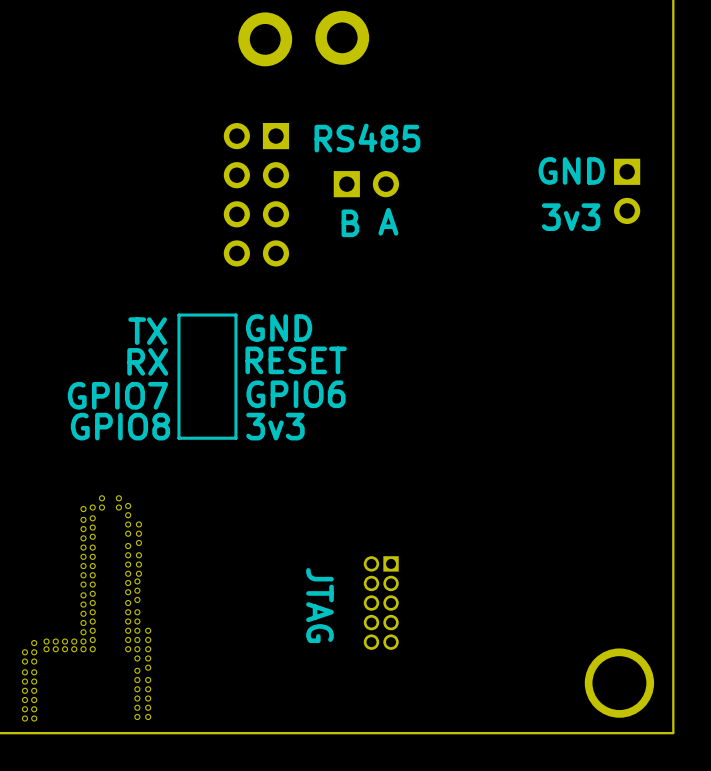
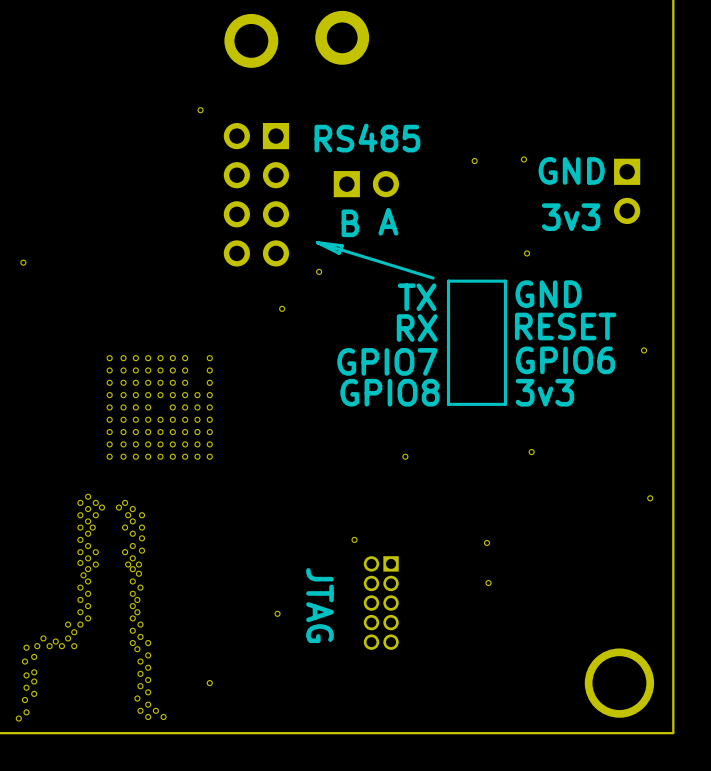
part footprint: [238, 12, 293, 67] -> [224, 13, 279, 68]
part: none -> (200, 110)
part: none -> (523, 159)
part: none -> (474, 161)
line: none -> (317, 242) (339, 253) (342, 245) (317, 242)
line: none -> (317, 242) (433, 278)
part: none -> (527, 253)
part: none -> (23, 262)
part: none -> (319, 271)
part: none -> (282, 308)
line: (235, 315) (235, 438) (178, 438) (178, 315) (235, 315) -> (505, 281) (505, 404) (448, 404) (448, 281) (505, 281)
text position: GND (279, 328) -> GND (548, 294)
text position: TX (147, 331) -> TX (417, 297)
part: none -> (644, 350)
part: none -> (109, 358)
part: none -> (123, 358)
part: none -> (135, 358)
part: none -> (148, 358)
part: none -> (160, 358)
part: none -> (172, 358)
part: none -> (185, 358)
part: none -> (209, 358)
text position: RESET (296, 360) -> RESET (565, 326)
text position: RX (147, 361) -> RX (417, 328)
part: none -> (109, 370)
part: none -> (123, 370)
part: none -> (135, 370)
part: none -> (148, 370)
part: none -> (160, 370)
part: none -> (172, 370)
part: none -> (185, 370)
part: none -> (209, 370)
part: none -> (109, 382)
part: none -> (123, 382)
part: none -> (135, 382)
part: none -> (148, 382)
part: none -> (160, 382)
part: none -> (172, 382)
part: none -> (185, 382)
part: none -> (209, 382)
text position: GPIO6 (296, 394) -> GPIO6 (565, 360)
part: none -> (109, 395)
text position: GPIO7 (117, 395) -> GPIO7 (387, 361)
part: none -> (123, 395)
part: none -> (135, 395)
part: none -> (148, 395)
part: none -> (160, 395)
part: none -> (172, 395)
part: none -> (185, 395)
part: none -> (197, 395)
part: none -> (209, 395)
part: none -> (109, 407)
part: none -> (123, 407)
part: none -> (135, 407)
part: none -> (148, 407)
part: none -> (172, 407)
part: none -> (185, 407)
part: none -> (197, 407)
part: none -> (209, 407)
part: none -> (109, 419)
part: none -> (123, 419)
part: none -> (135, 419)
part: none -> (148, 419)
part: none -> (160, 419)
part: none -> (172, 419)
part: none -> (185, 419)
part: none -> (197, 419)
part: none -> (209, 419)
text position: GPIO8 (120, 426) -> GPIO8 (389, 392)
text position: 3v3 (275, 426) -> 3v3 (544, 392)
part: none -> (109, 432)
part: none -> (123, 432)
part: none -> (135, 432)
part: none -> (148, 432)
part: none -> (160, 432)
part: none -> (172, 432)
part: none -> (185, 432)
part: none -> (197, 432)
part: none -> (209, 432)
part: none -> (109, 444)
part: none -> (123, 444)
part: none -> (135, 444)
part: none -> (148, 444)
part: none -> (160, 444)
part: none -> (172, 444)
part: none -> (185, 444)
part: none -> (197, 444)
part: none -> (209, 444)
part: none -> (531, 452)
part: none -> (109, 456)
part: none -> (123, 456)
part: none -> (135, 456)
part: none -> (148, 456)
part: none -> (160, 456)
part: none -> (172, 456)
part: none -> (185, 456)
part: none -> (197, 456)
part: none -> (209, 456)
part: none -> (405, 456)
part: none -> (88, 496)
part: (101, 498) -> none
part: (118, 498) -> none
part: none -> (650, 498)
part: none -> (80, 502)
part: none -> (95, 502)
part: none -> (125, 502)
part: (128, 506) -> none
part: (92, 507) -> none
part: (83, 509) -> none
part: none -> (88, 509)
part: none -> (132, 509)
part: none -> (80, 515)
part: none -> (95, 515)
part: none -> (142, 515)
part: (92, 518) -> none
part: (83, 519) -> none
part: none -> (88, 521)
part: none -> (132, 521)
part: (128, 524) -> none
part: (138, 524) -> none
part: none -> (80, 527)
part: none -> (125, 527)
part: none -> (142, 527)
part: (83, 529) -> none
part: none -> (88, 533)
part: (128, 533) -> none
part: none -> (132, 533)
part: (138, 533) -> none
part: (92, 536) -> none
part: (83, 538) -> none
part: none -> (142, 538)
part: none -> (80, 539)
part: none -> (354, 539)
part: (138, 542) -> none
part: none -> (486, 542)
part: none -> (88, 546)
part: (128, 546) -> none
part: none -> (132, 546)
part: (83, 547) -> none
part: (92, 547) -> none
part: none -> (142, 550)
part: none -> (80, 552)
part: none -> (95, 552)
part: none -> (125, 552)
part: (128, 555) -> none
part: (138, 555) -> none
part: (83, 556) -> none
part: (92, 556) -> none
part: none -> (88, 558)
part: none -> (132, 558)
part: none -> (80, 562)
part: none -> (95, 564)
part: (83, 566) -> none
part: (92, 566) -> none
part: none -> (88, 569)
part: none -> (132, 569)
part: (128, 573) -> none
part: (92, 575) -> none
part: none -> (88, 581)
part: none -> (132, 581)
part: (137, 581) -> none
part: (128, 583) -> none
part: none -> (488, 583)
part: (83, 584) -> none
part: (92, 584) -> none
part: none -> (80, 587)
part: none -> (140, 587)
part: (137, 590) -> none
part: (128, 592) -> none
part: none -> (88, 593)
part: (92, 593) -> none
part: none -> (132, 593)
part: (83, 595) -> none
part: none -> (80, 599)
part: (92, 603) -> none
part: (128, 603) -> none
part: (83, 604) -> none
part: none -> (88, 606)
part: none -> (132, 606)
part: none -> (80, 612)
part: (92, 612) -> none
part: (128, 612) -> none
part: (83, 613) -> none
part: none -> (277, 613)
part: none -> (88, 618)
part: none -> (132, 618)
part: (92, 621) -> none
part: (128, 621) -> none
part: (137, 621) -> none
part: (83, 623) -> none
part: none -> (68, 624)
part: none -> (80, 624)
part: none -> (140, 624)
part: (92, 630) -> none
part: (128, 630) -> none
part: none -> (132, 630)
part: (137, 630) -> none
part: (148, 630) -> none
part: none -> (74, 632)
part: (83, 632) -> none
part: none -> (140, 636)
part: none -> (43, 638)
part: none -> (68, 638)
part: (92, 639) -> none
part: (128, 639) -> none
part: (137, 639) -> none
part: (148, 639) -> none
part: (46, 641) -> none
part: (65, 641) -> none
part: (74, 641) -> none
part: (83, 641) -> none
part: (34, 643) -> none
part: none -> (132, 643)
part: none -> (148, 643)
part: none -> (37, 646)
part: none -> (49, 646)
part: none -> (61, 646)
part: none -> (74, 646)
part: none -> (26, 647)
part: (46, 649) -> none
part: (55, 649) -> none
part: (65, 649) -> none
part: (74, 649) -> none
part: (83, 649) -> none
part: (92, 649) -> none
part: (128, 649) -> none
part: (148, 649) -> none
part: (24, 652) -> none
part: (34, 652) -> none
part: none -> (148, 655)
part: none -> (34, 656)
part: (137, 658) -> none
part: (148, 658) -> none
part: (34, 661) -> none
part: none -> (140, 661)
part: (137, 670) -> none
part: (24, 672) -> none
part: none -> (140, 673)
part: none -> (26, 675)
part: (137, 680) -> none
part: (24, 681) -> none
part: none -> (209, 683)
part: none -> (140, 686)
part: none -> (26, 687)
part: (137, 689) -> none
part: (148, 689) -> none
part: (24, 690) -> none
part: (34, 690) -> none
part: none -> (148, 692)
part: none -> (34, 693)
part: (148, 698) -> none
part: (34, 700) -> none
part: none -> (148, 704)
part: (137, 707) -> none
part: (148, 707) -> none
part: (24, 709) -> none
part: (34, 709) -> none
part: none -> (140, 710)
part: none -> (155, 710)
part: none -> (26, 712)
part: (137, 716) -> none
part: none -> (163, 716)
part: none -> (18, 718)
part: (24, 718) -> none
part: (34, 718) -> none

